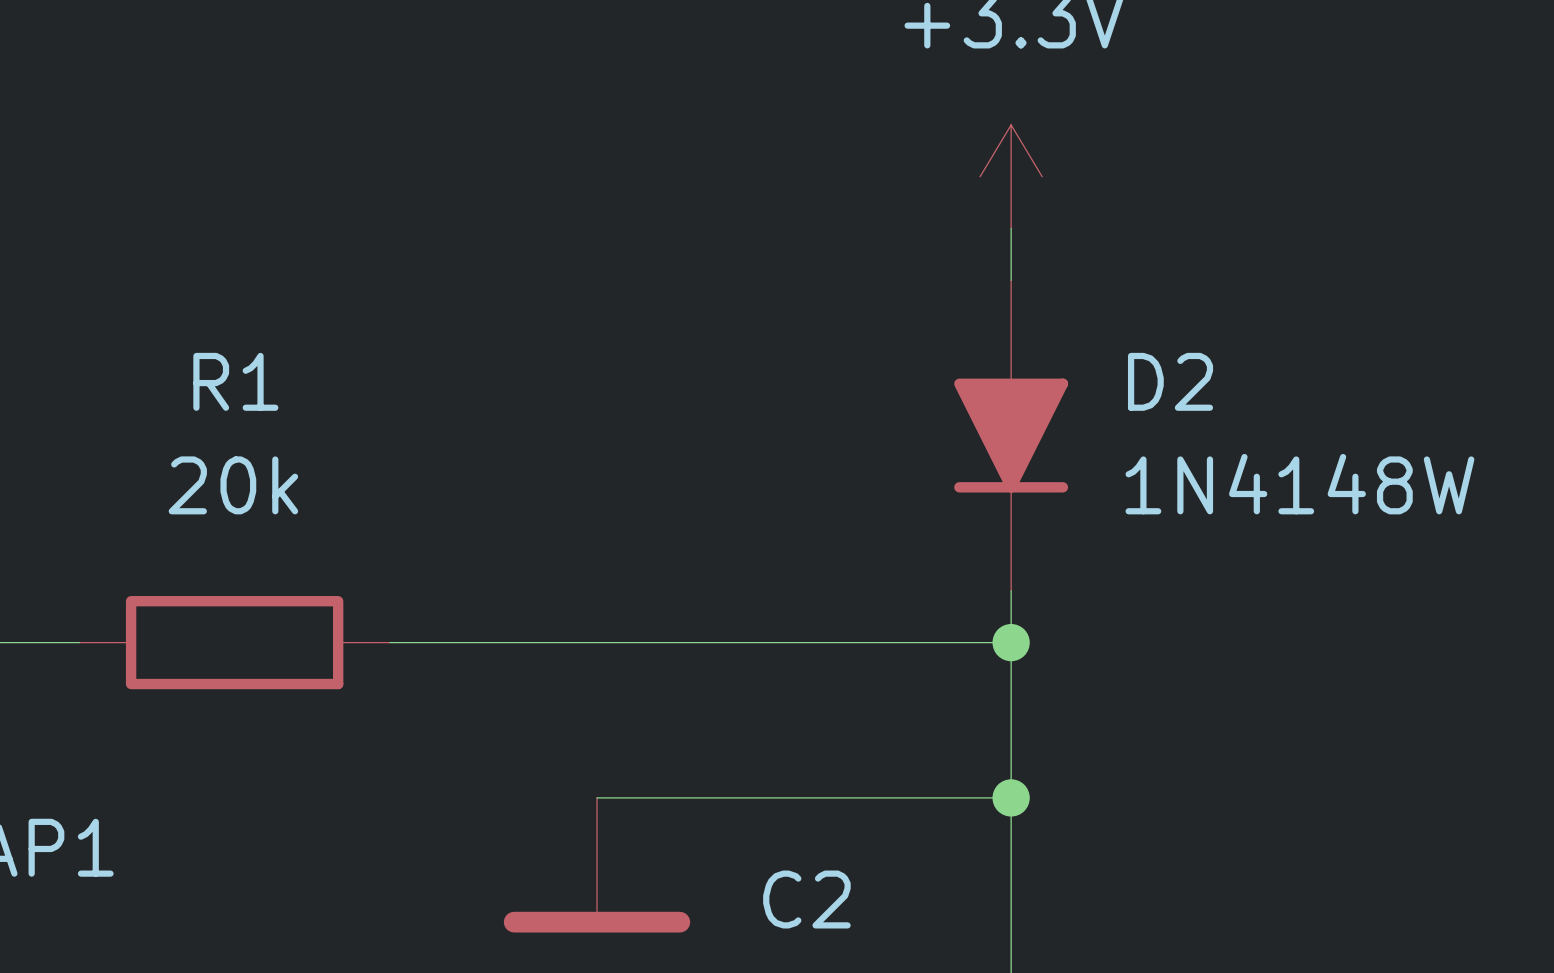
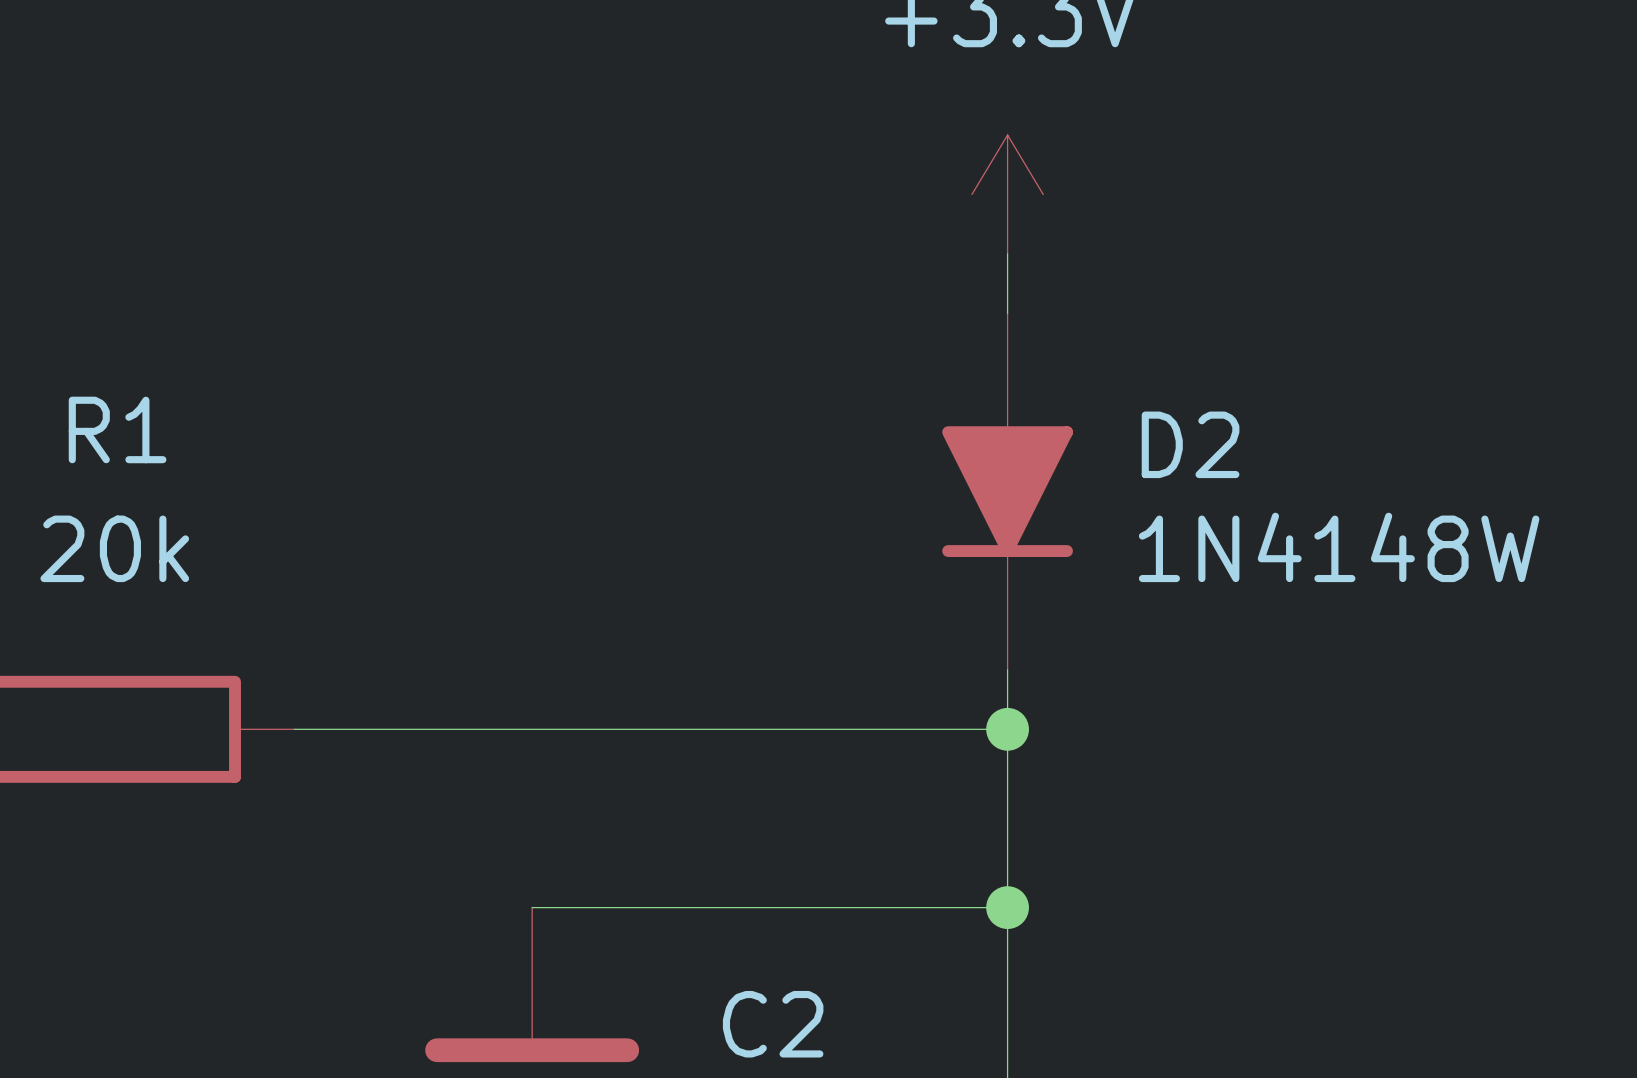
D2 name position: D2 (1170, 381) -> D2 (1190, 444)

